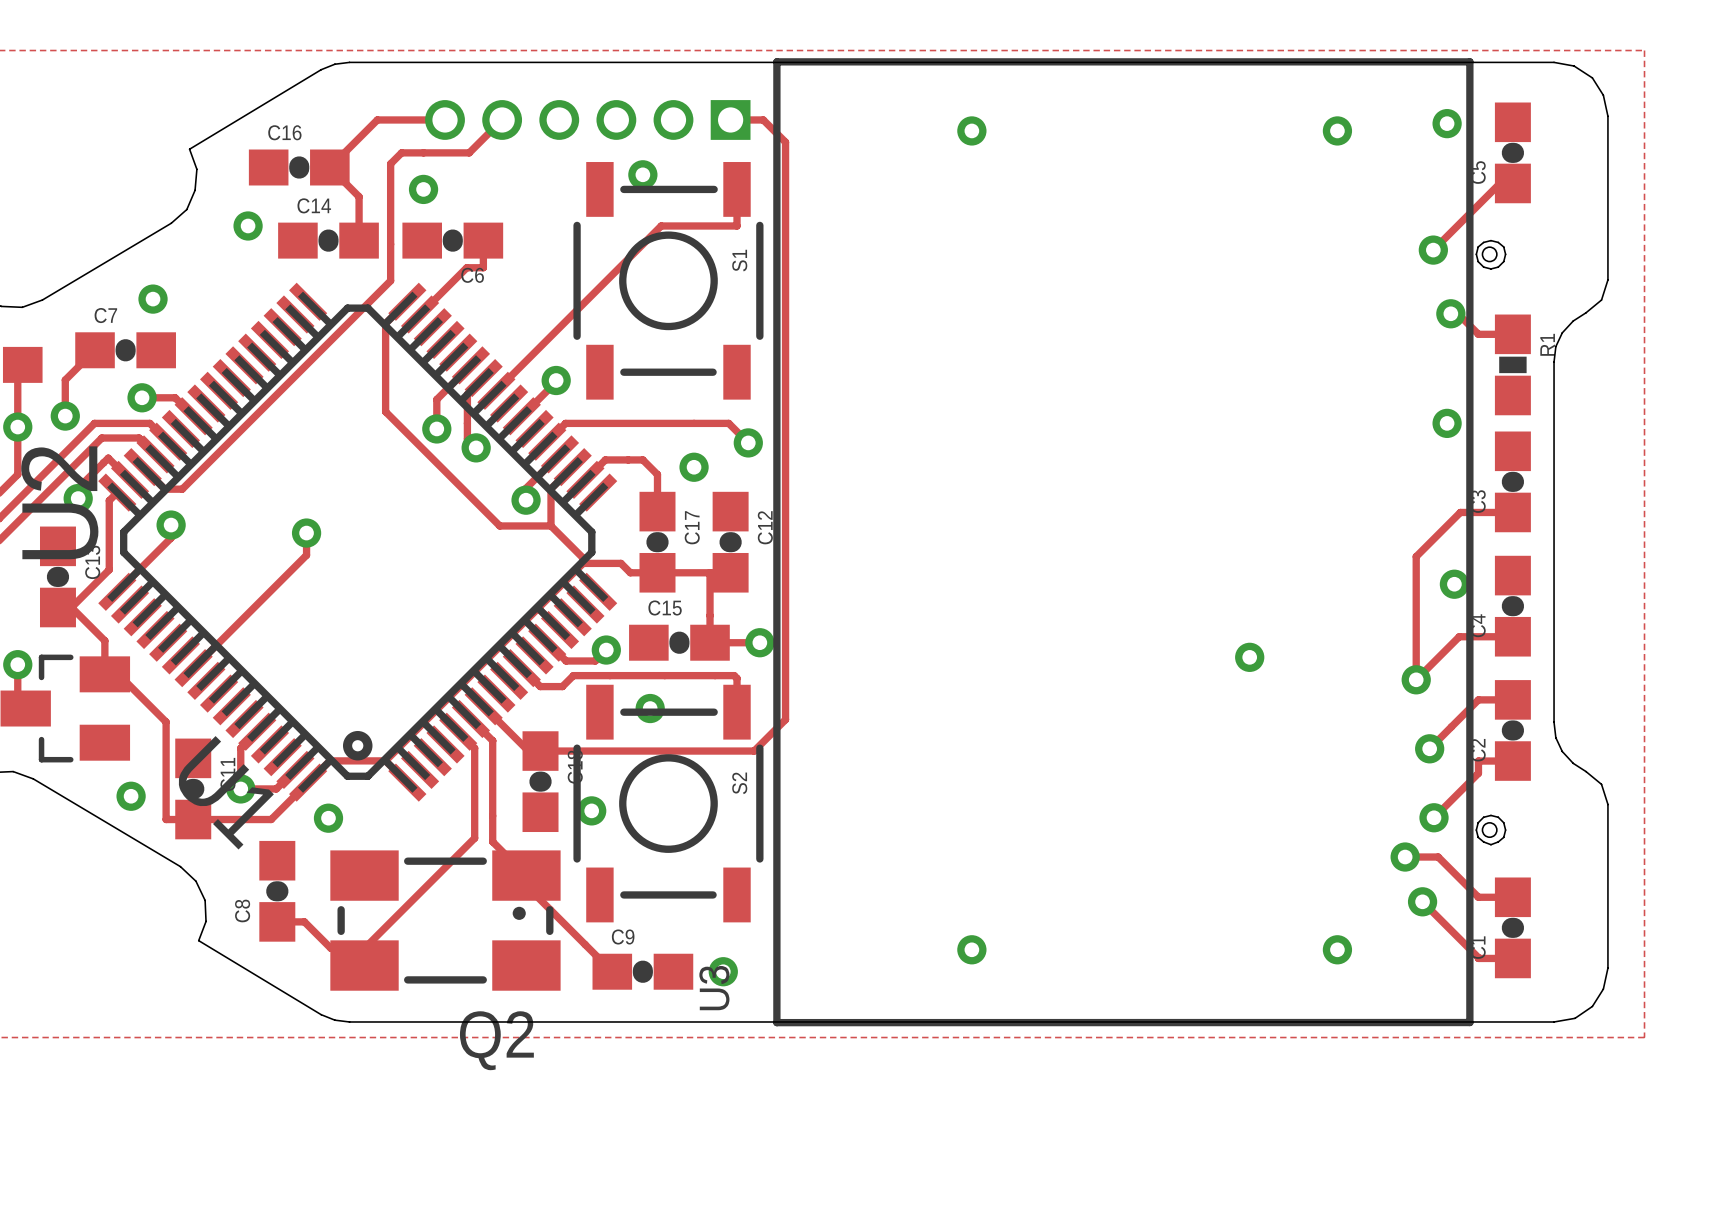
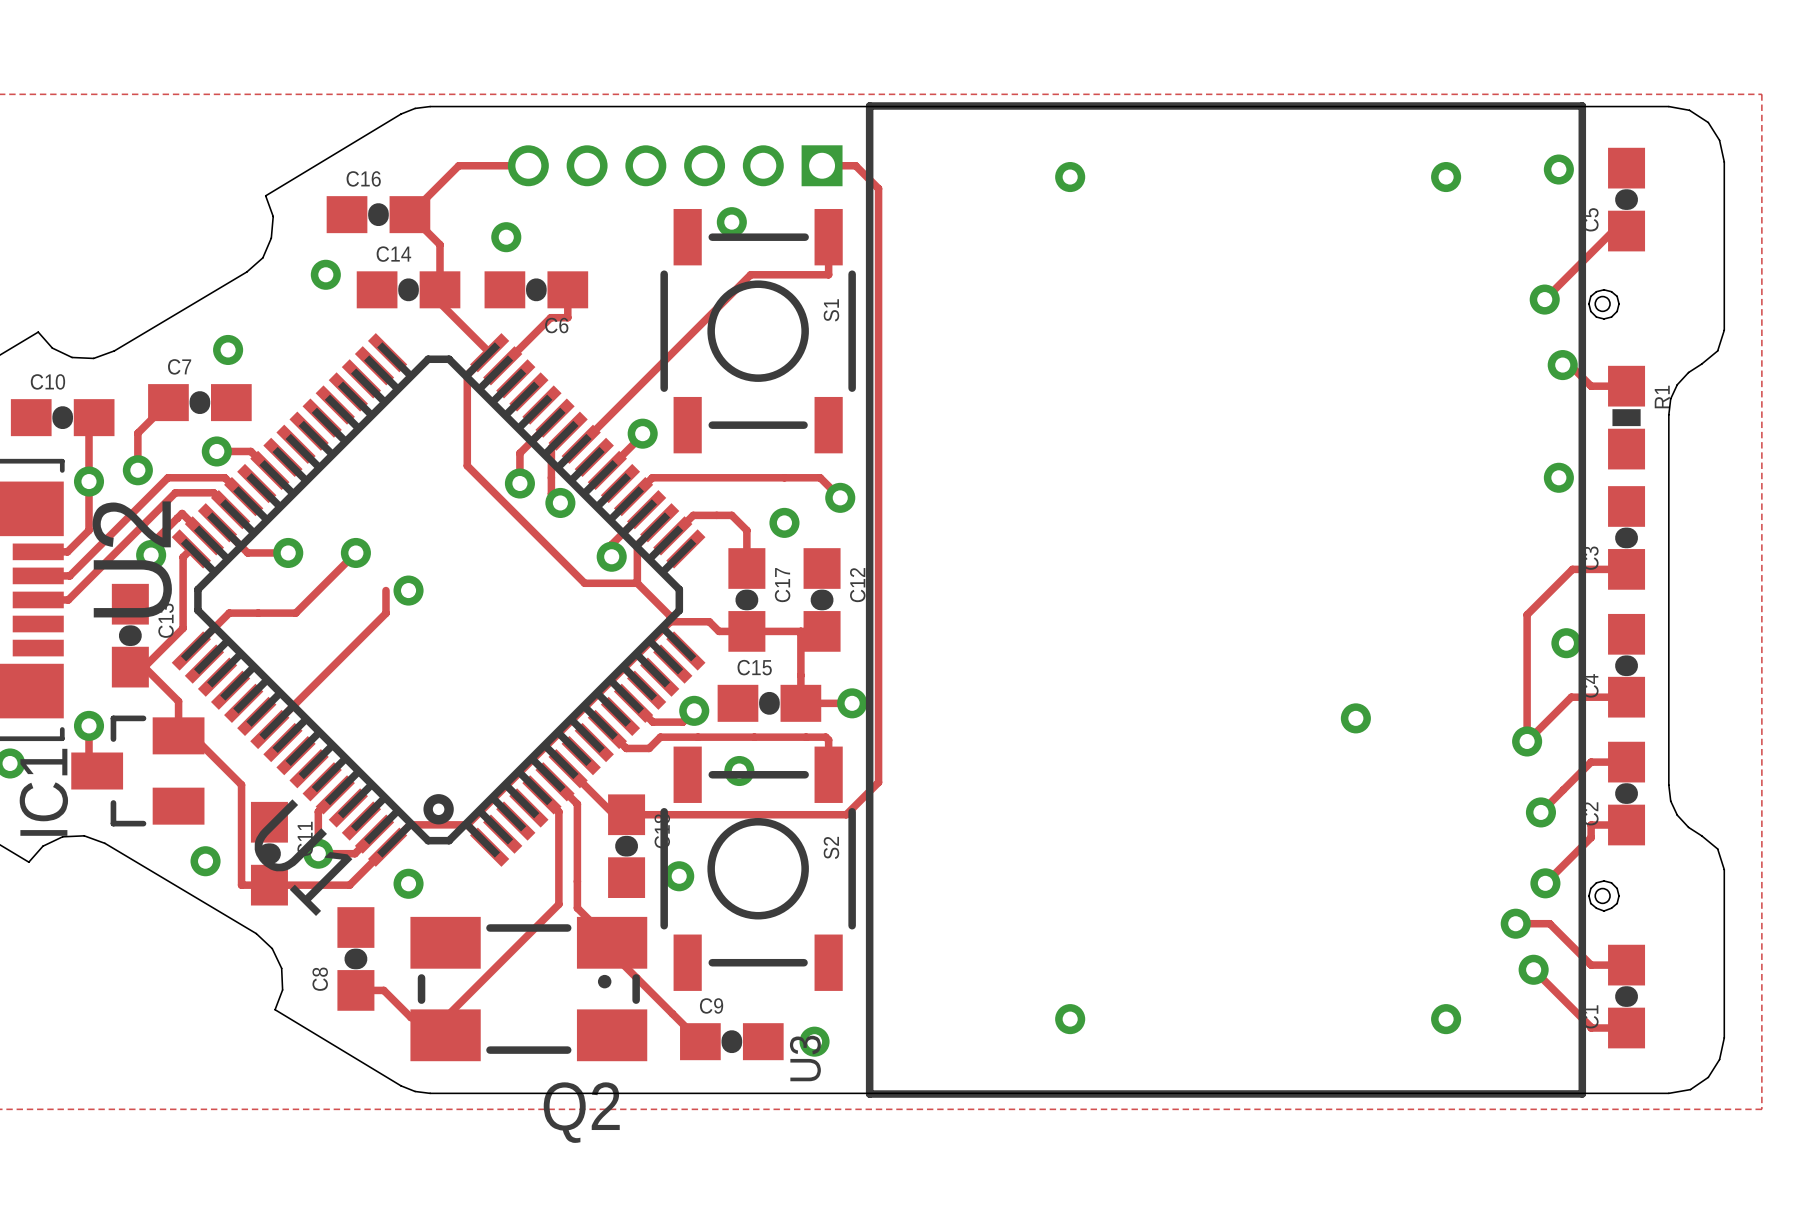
track: (502, 119) (469, 152) (401, 152) (390, 163) (390, 280) (182, 489) (164, 489) -> (288, 552) (247, 552) (240, 545)
track: none -> (439, 289) (439, 303) (489, 352)
via: none -> (355, 552)
track: (171, 525) (171, 538) (154, 554) -> (355, 552) (295, 613) (229, 613)
via position: (171, 525) -> (288, 552)
via position: (306, 533) -> (408, 590)

